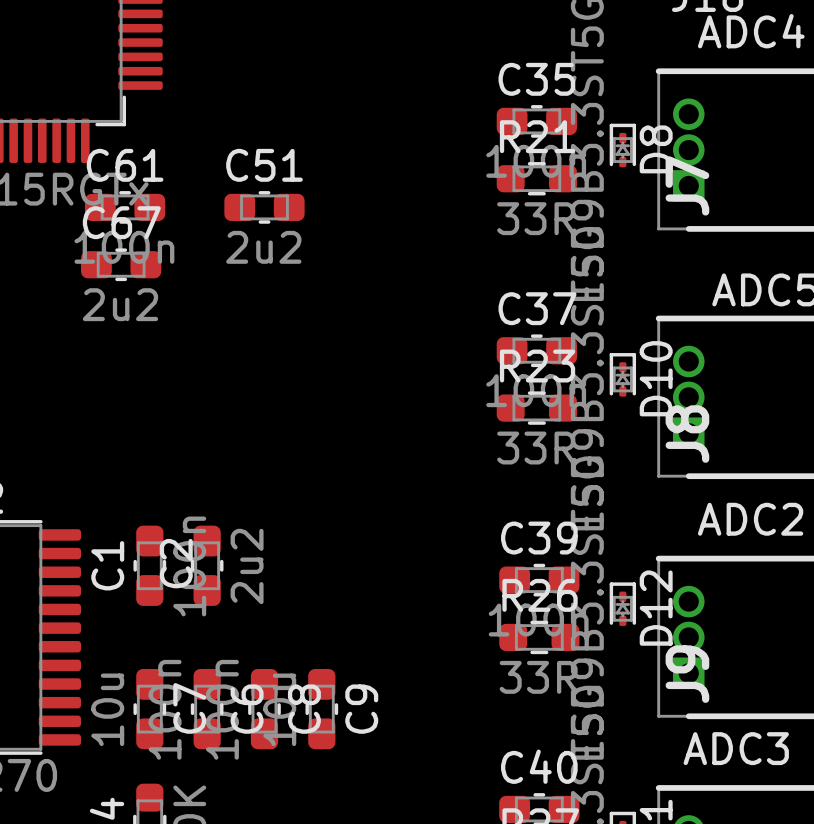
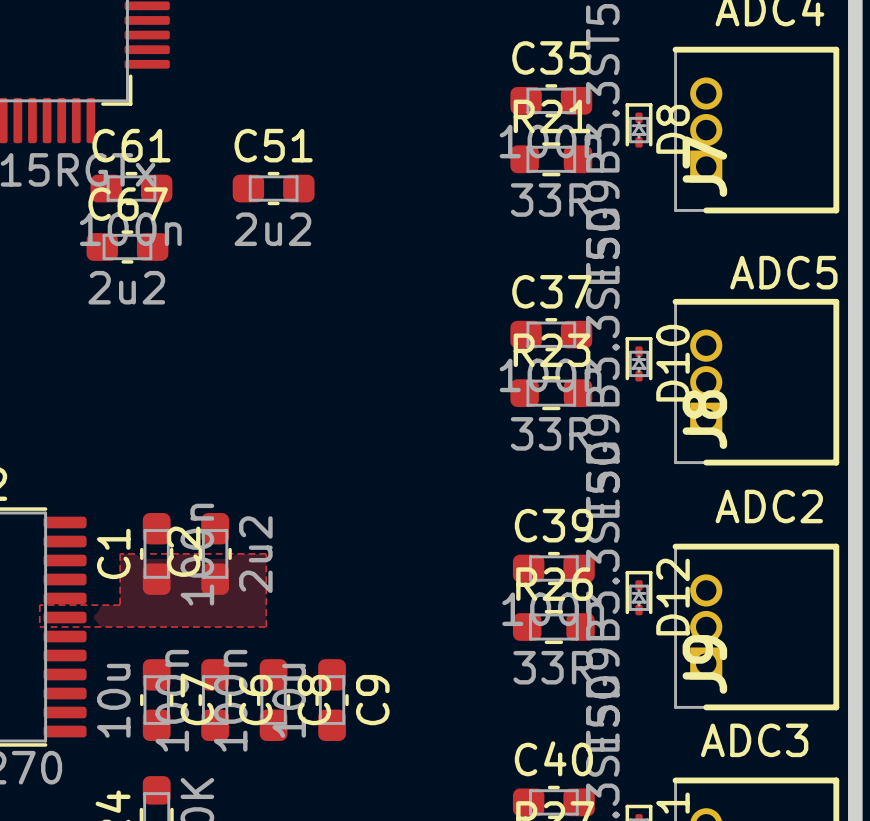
zone outline: none -> (120, 553) (266, 553) (266, 627) (39, 627) (39, 605) (120, 605) (120, 553)

